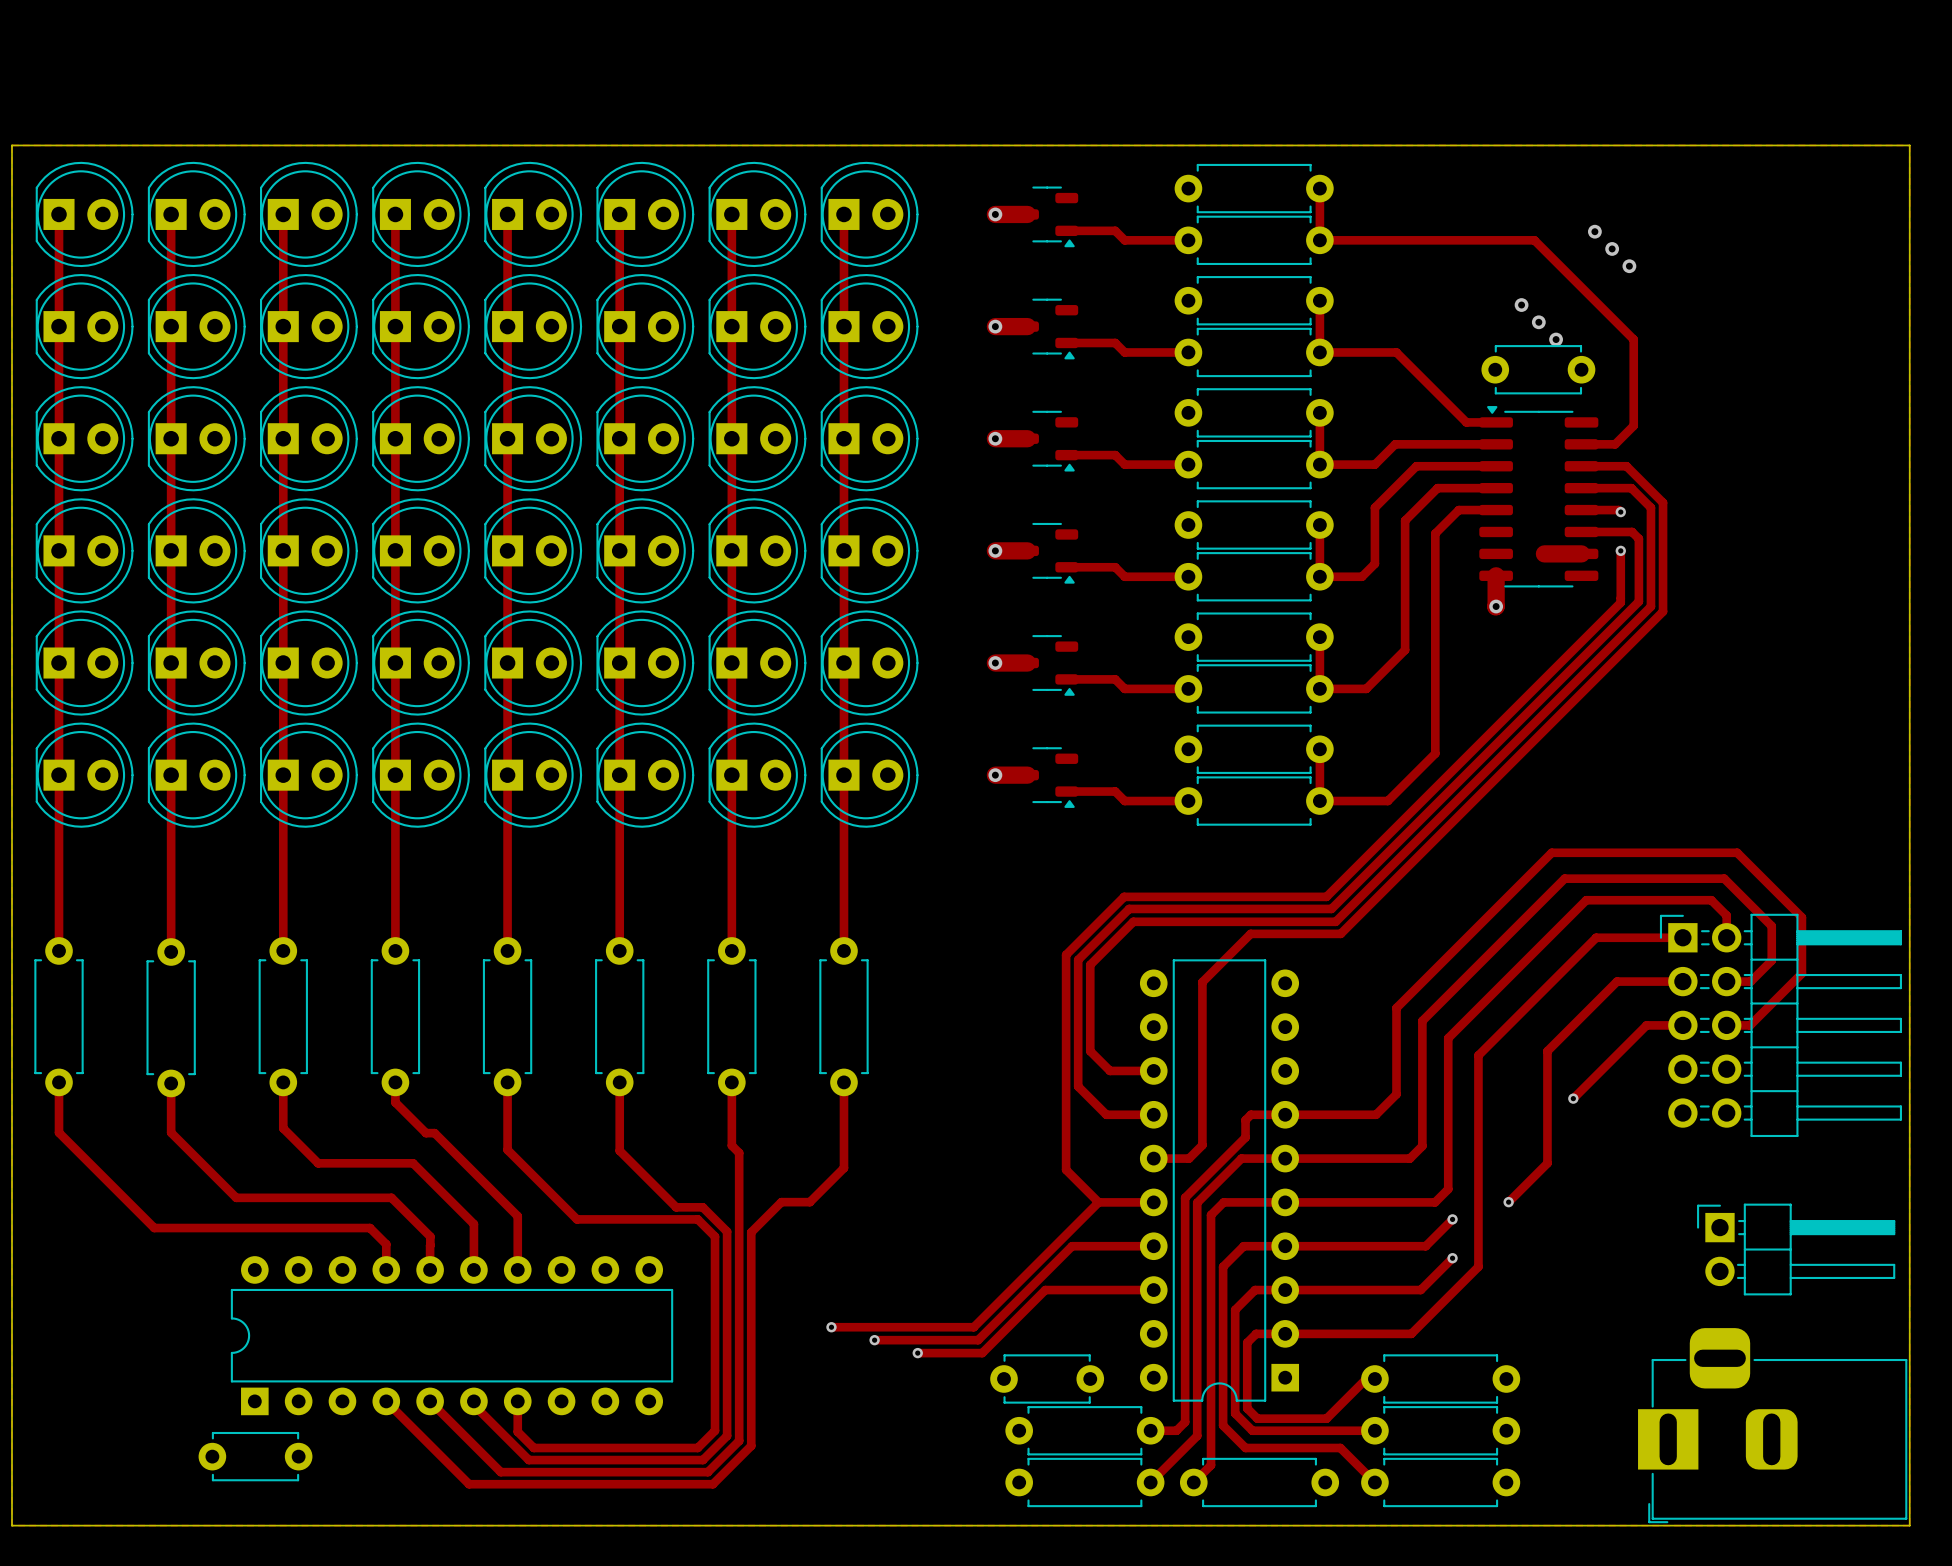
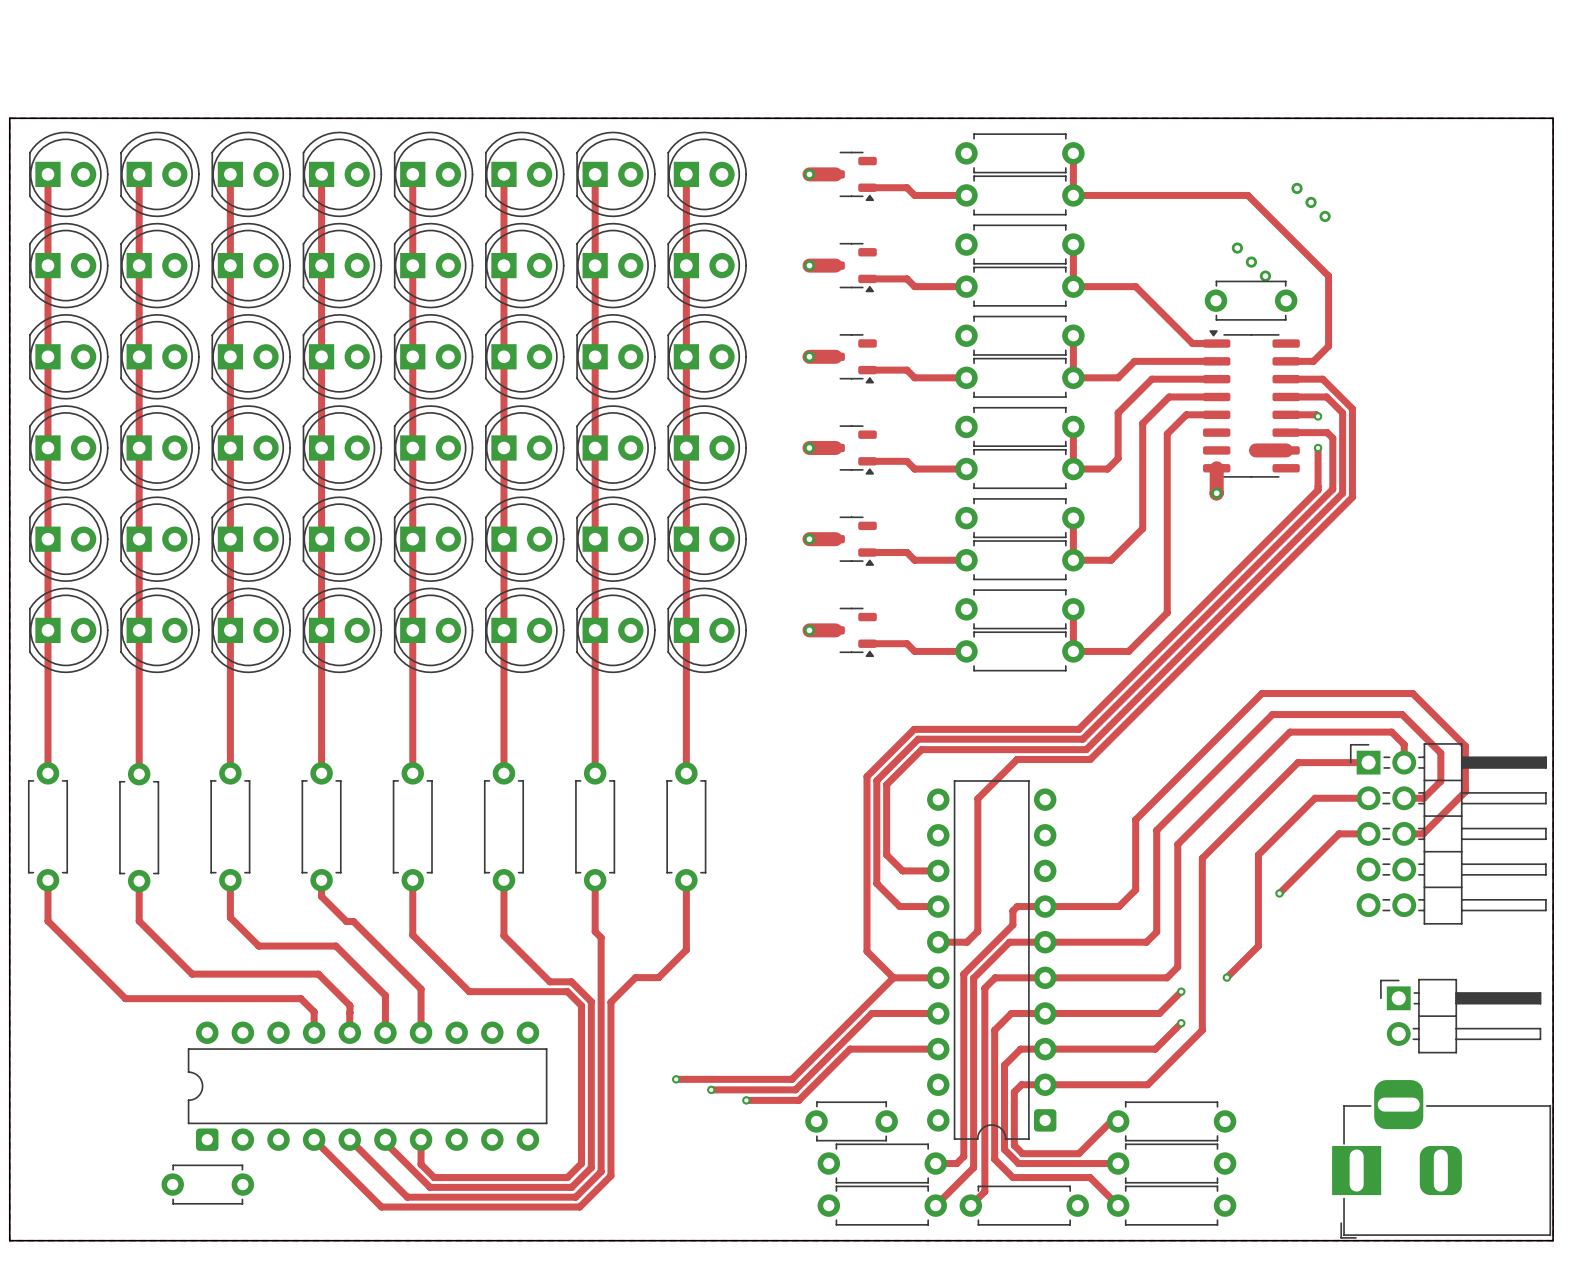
part footprint: [1139, 959, 1300, 1402] -> [927, 780, 1057, 1140]
part footprint: [230, 1256, 674, 1416] -> [187, 1021, 548, 1151]

